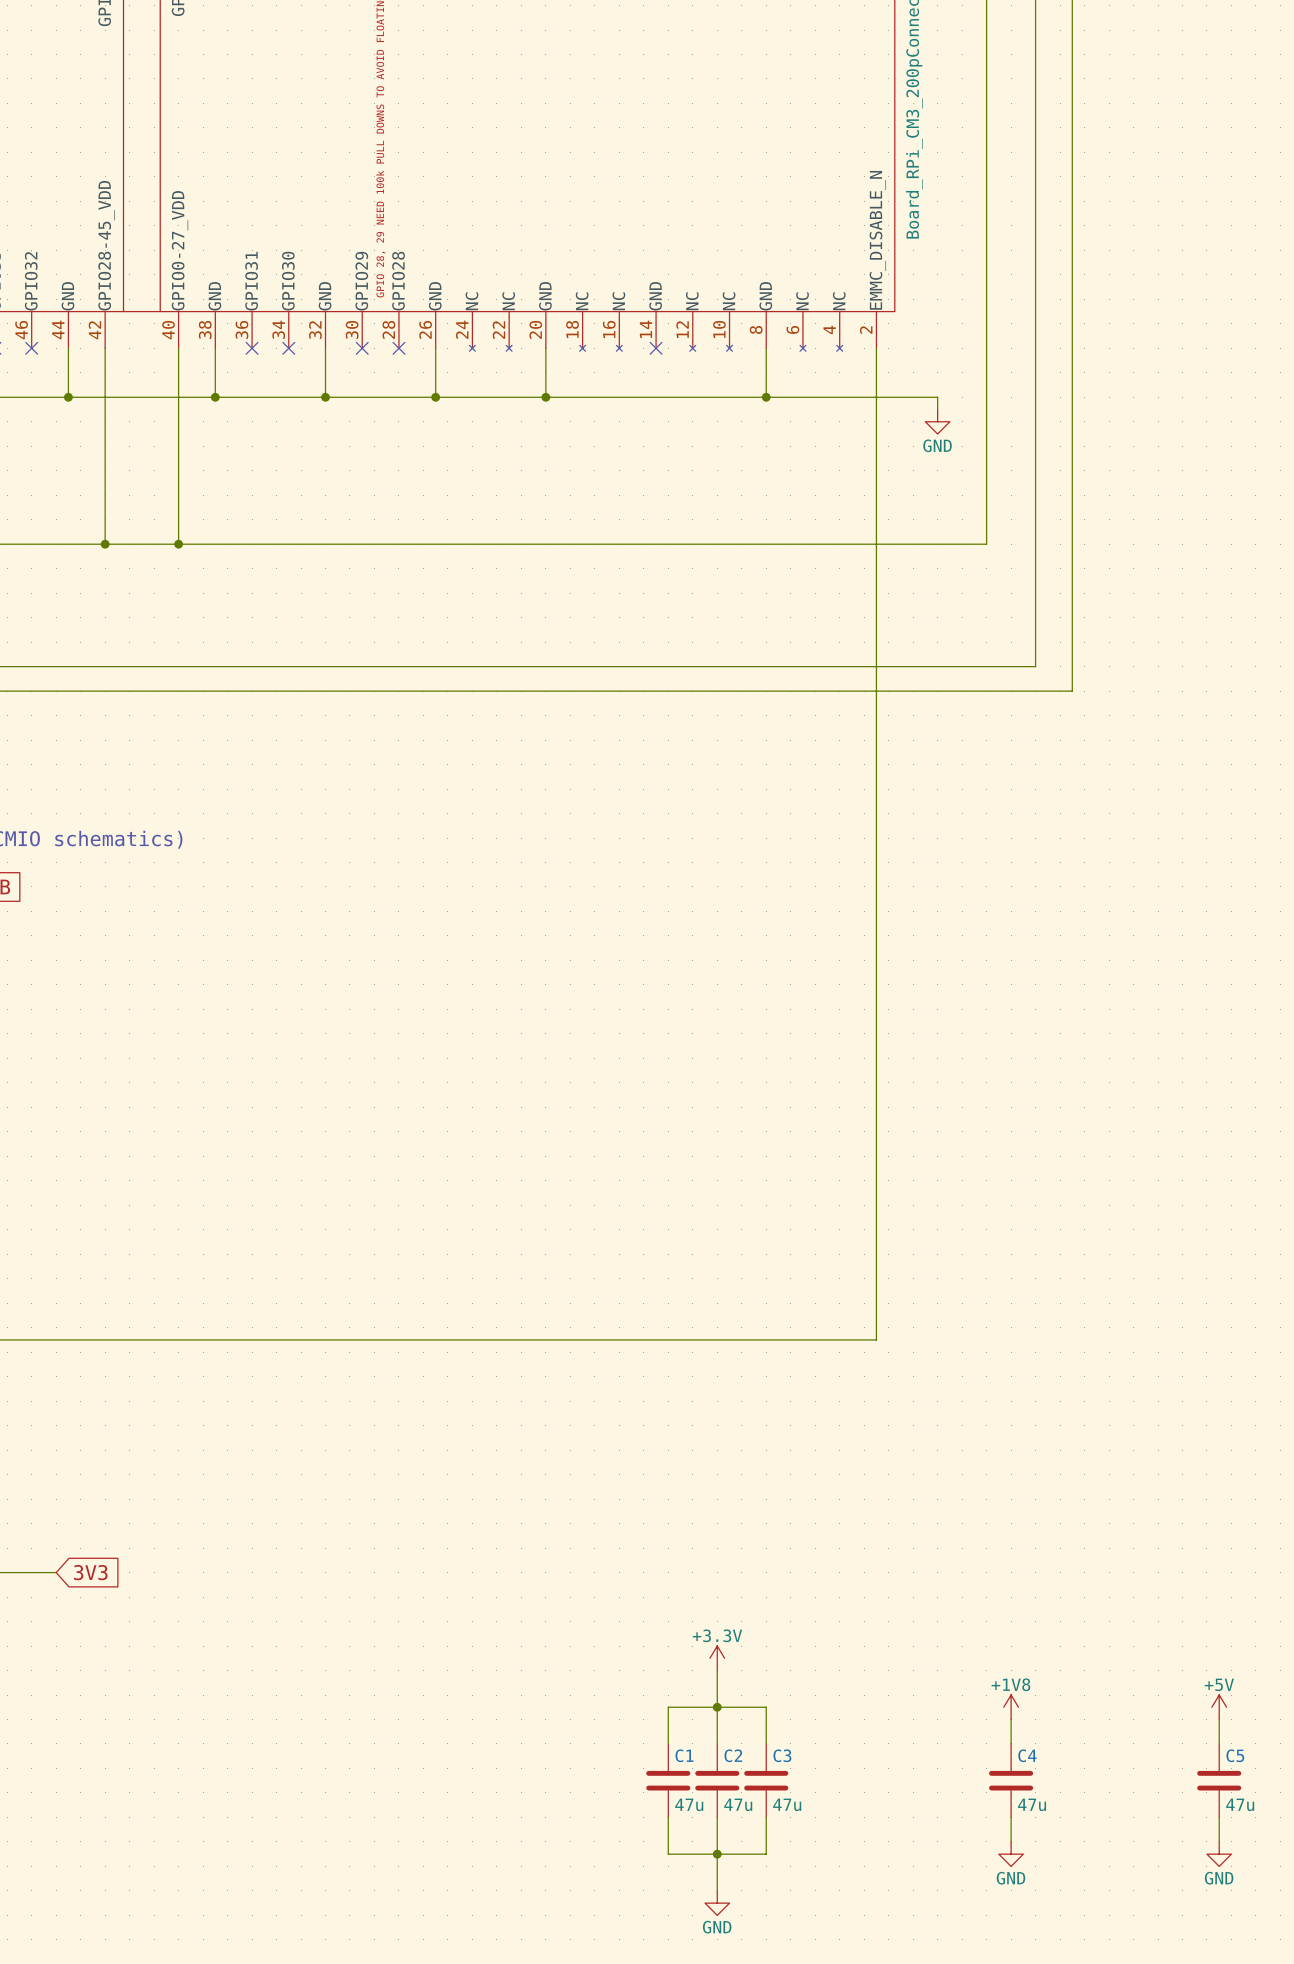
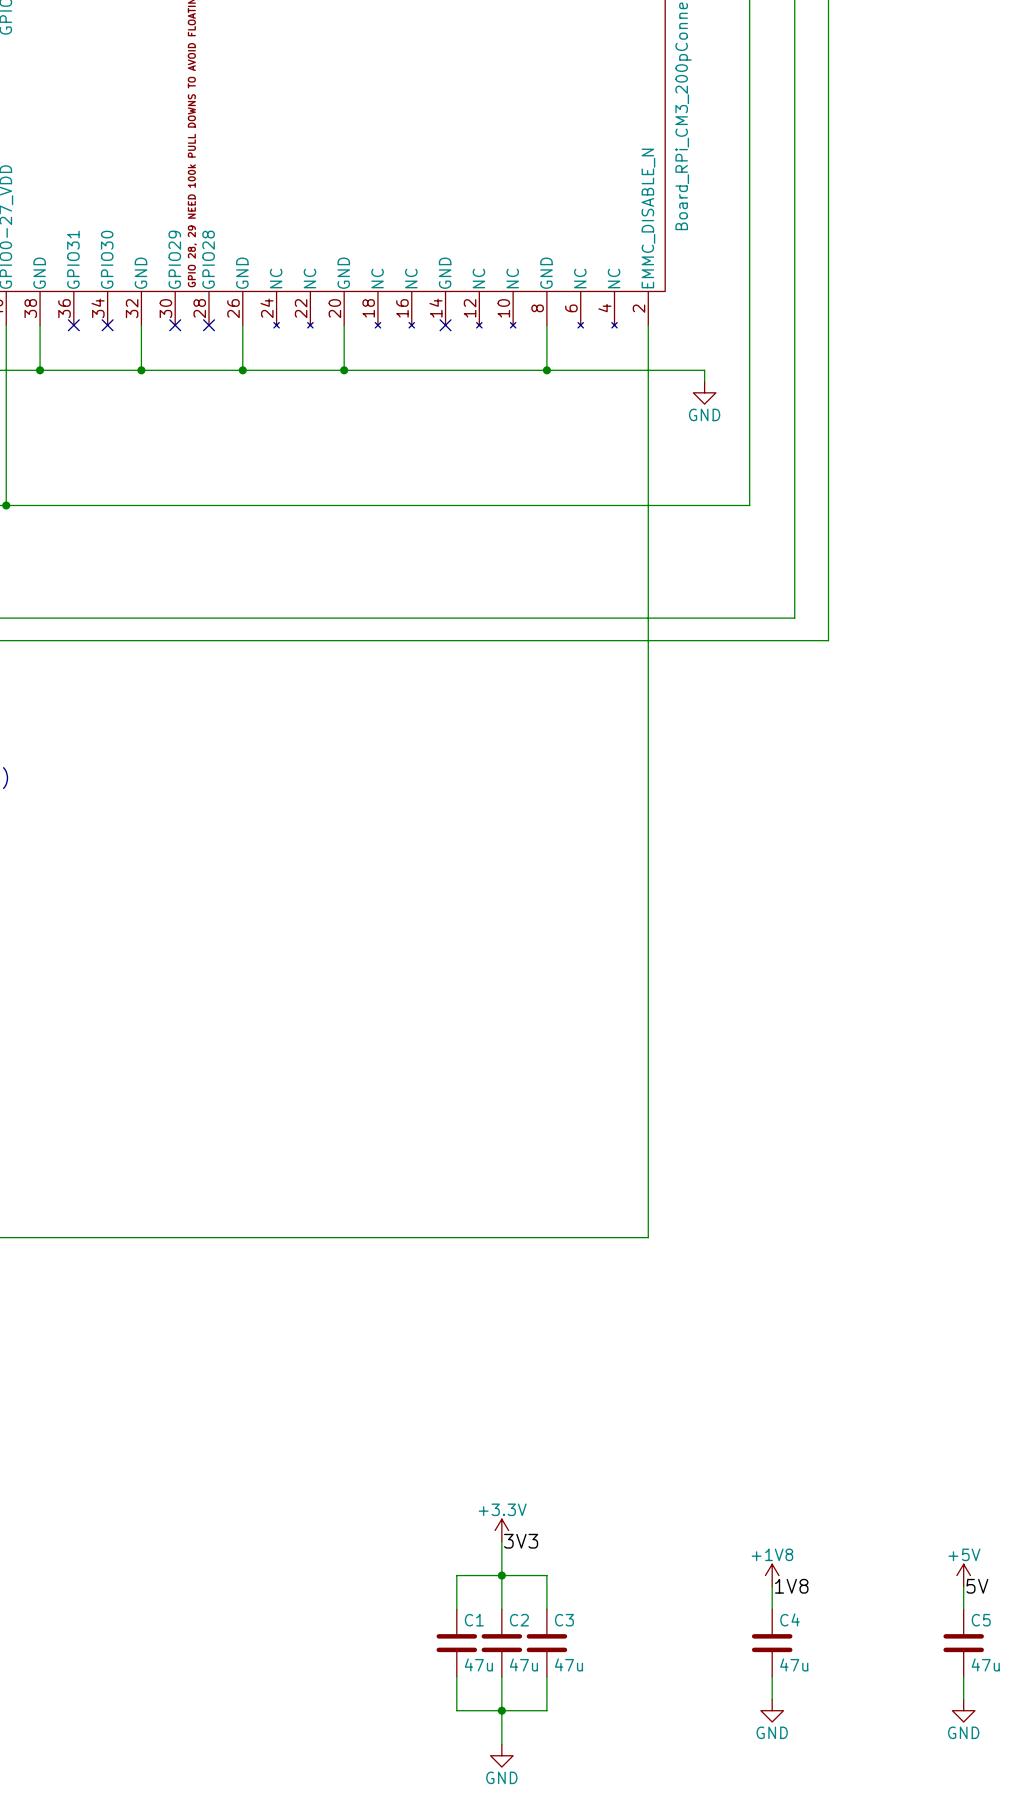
label: none -> 3V3 (521, 1541)
label: none -> 1V8 (791, 1586)
label: none -> 5V (977, 1586)

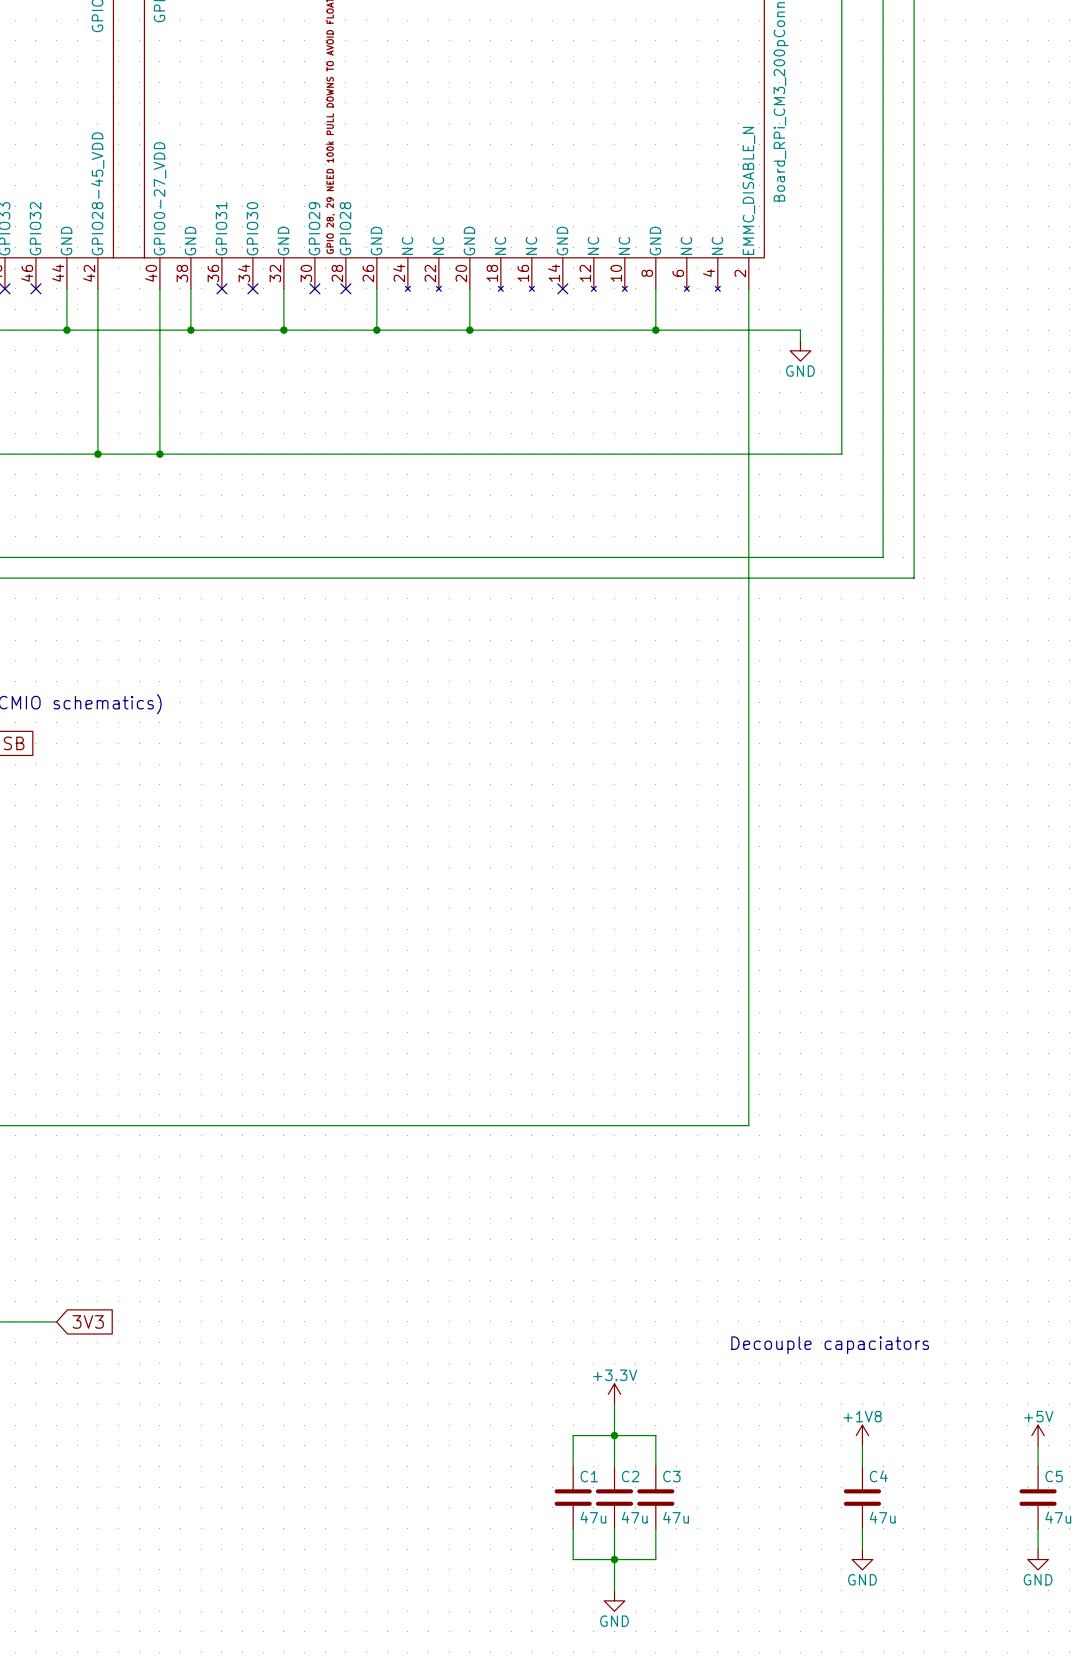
text: none -> Decouple capaciators (830, 1345)
label: 3V3 (521, 1541) -> none
label: 1V8 (791, 1586) -> none
label: 5V (977, 1586) -> none

